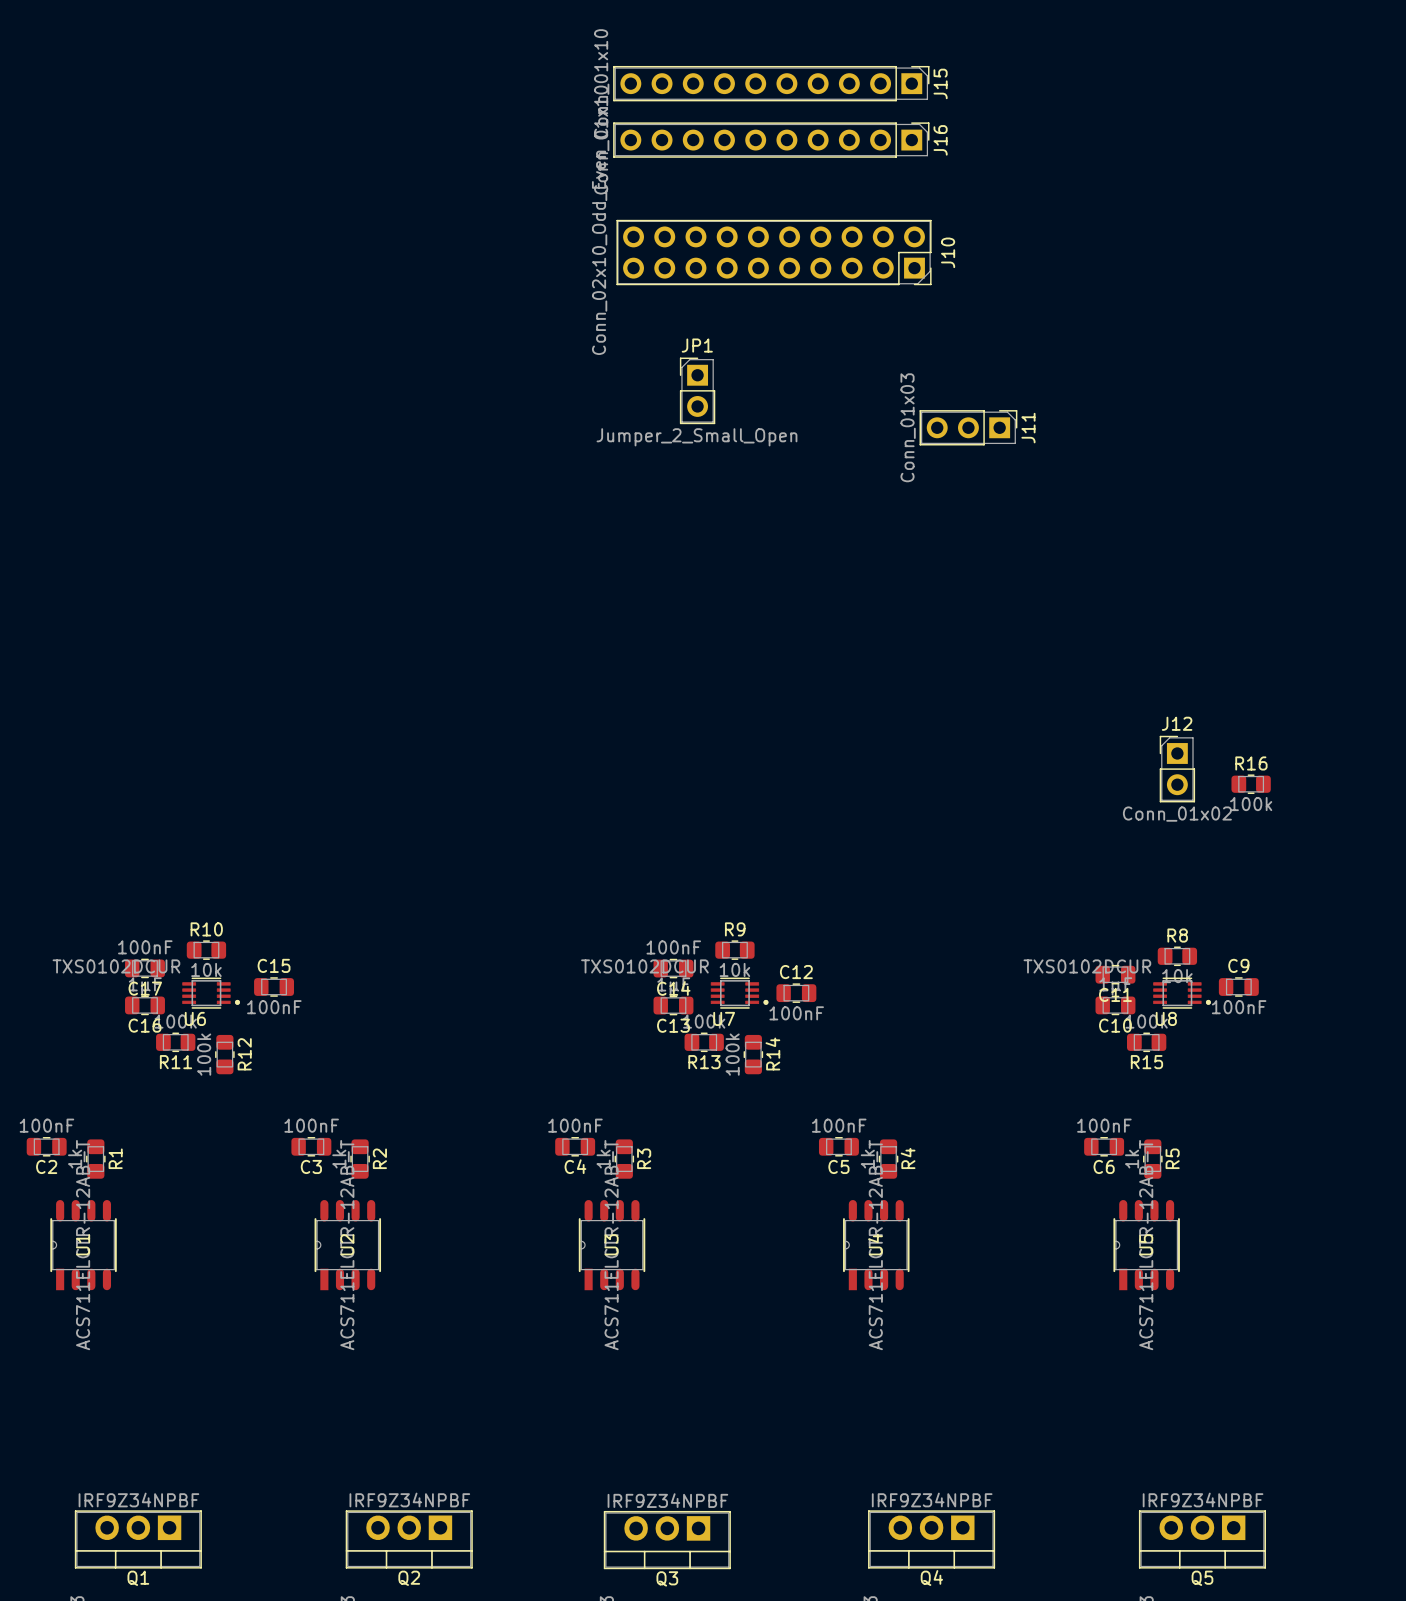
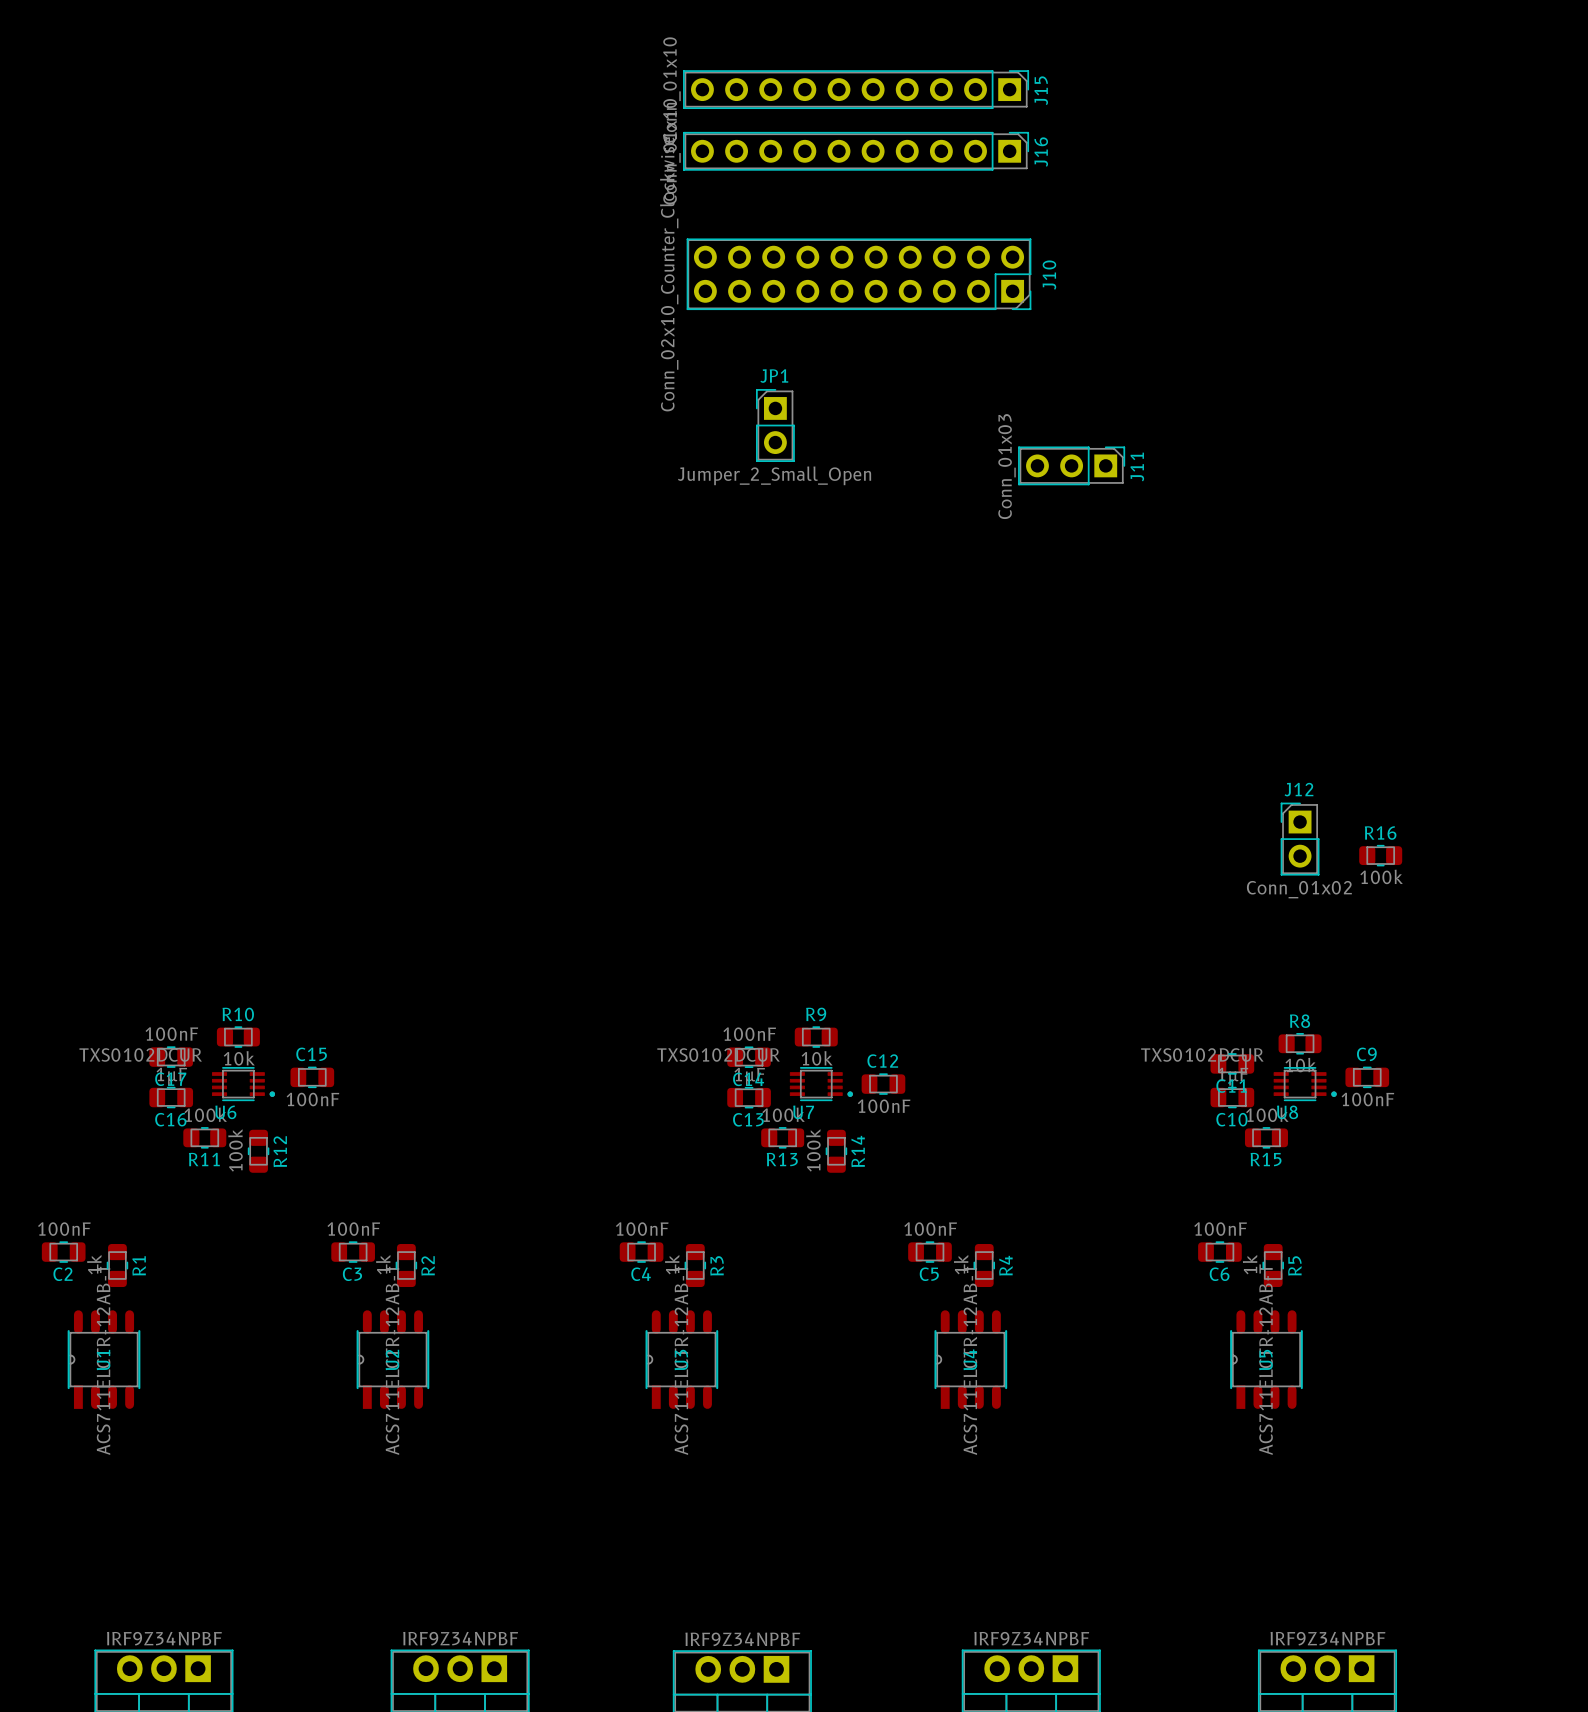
J10 value: Conn_02x10_Odd_Even (599, 252) -> Conn_02x10_Counter_Clockwise (669, 274)

